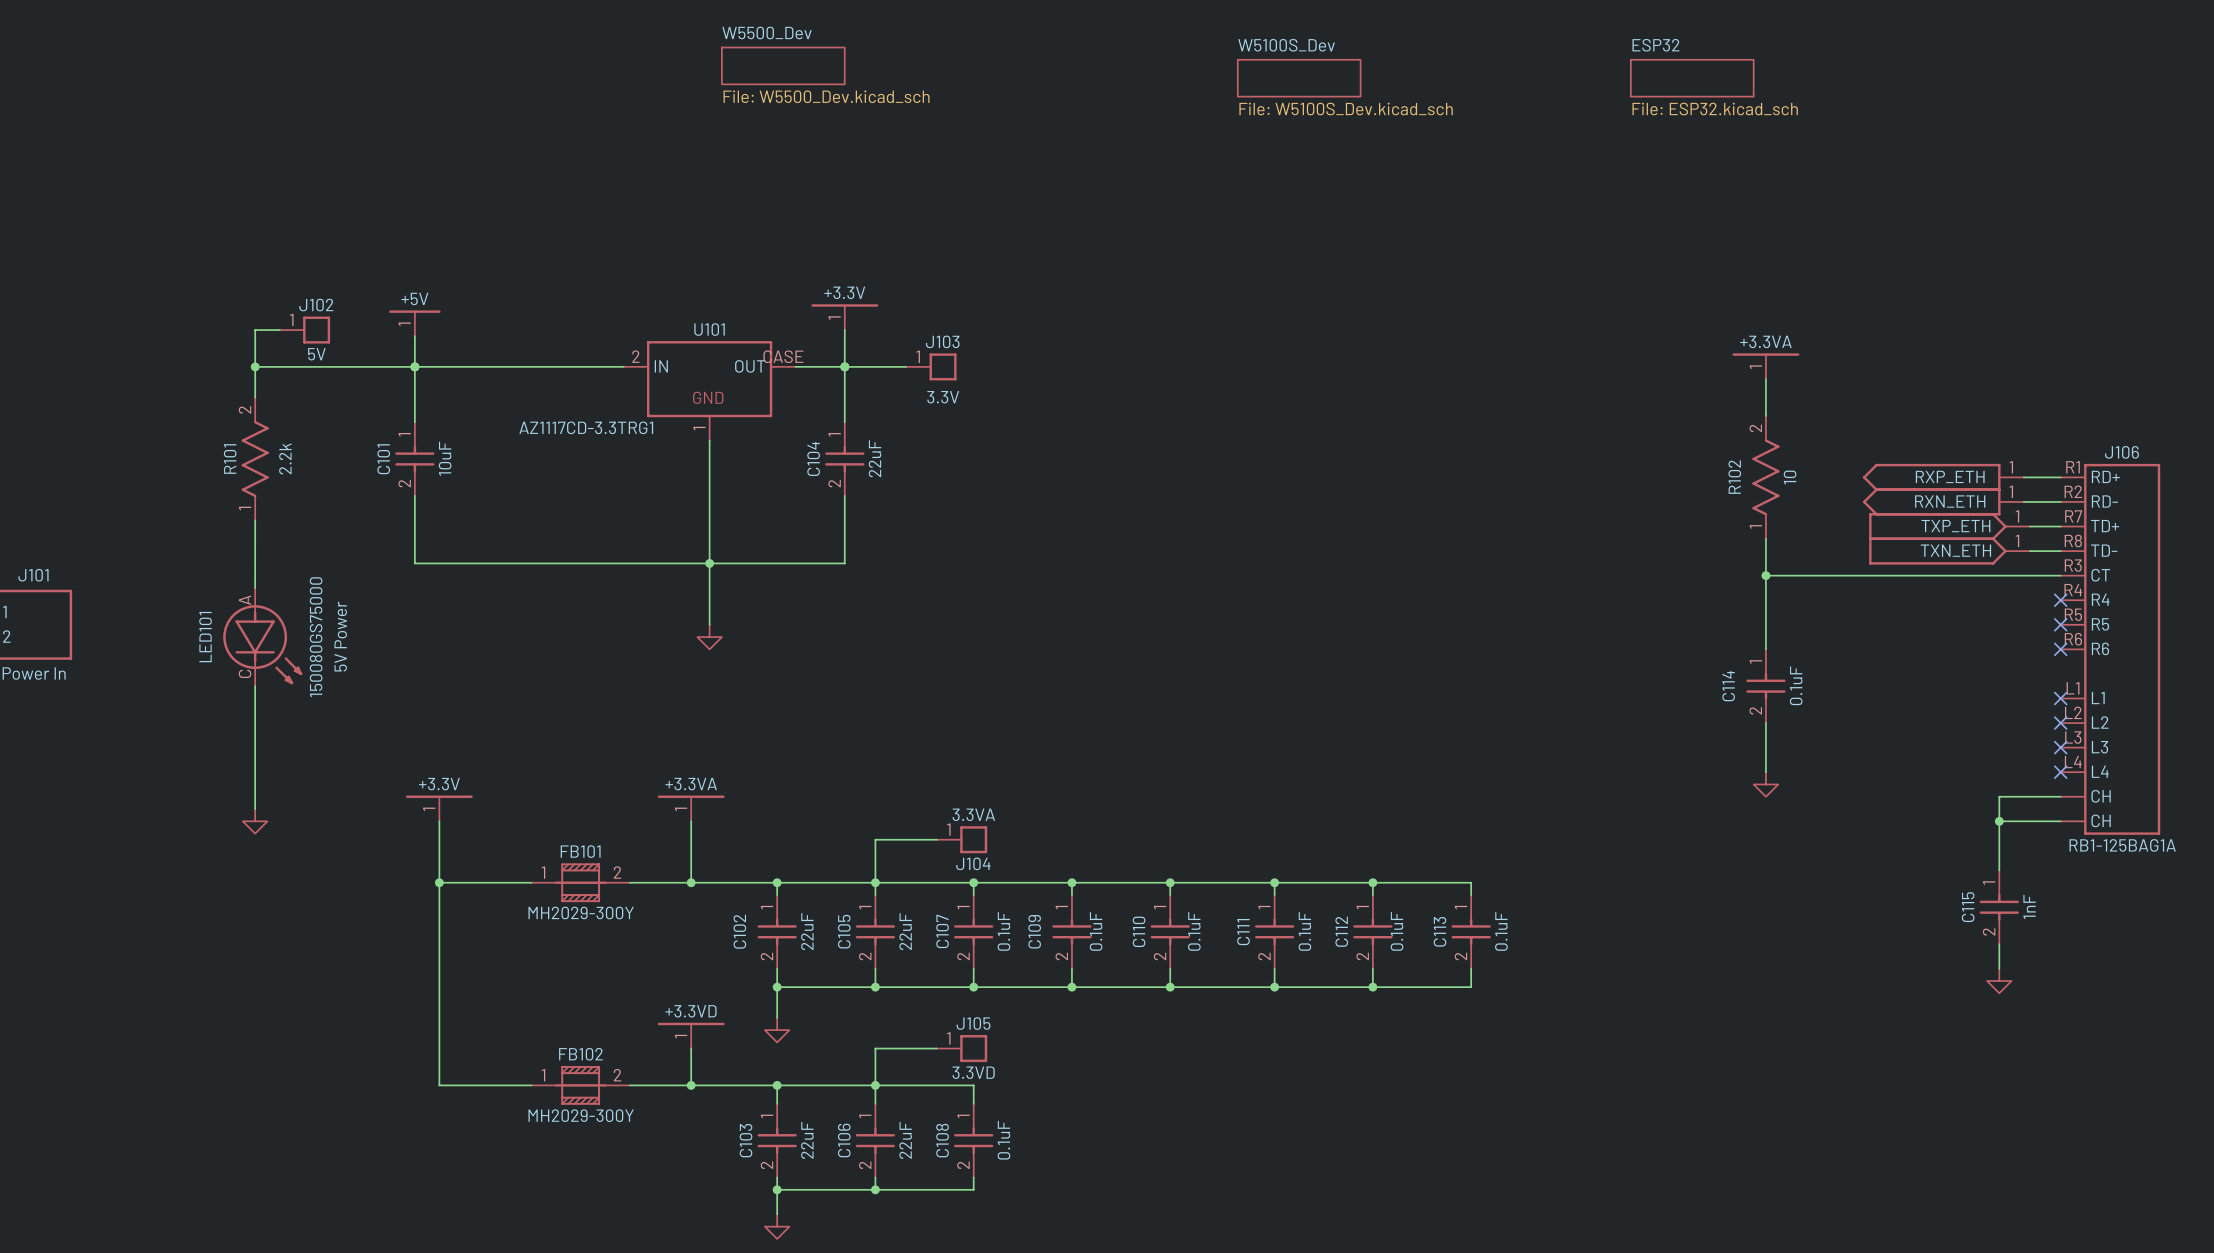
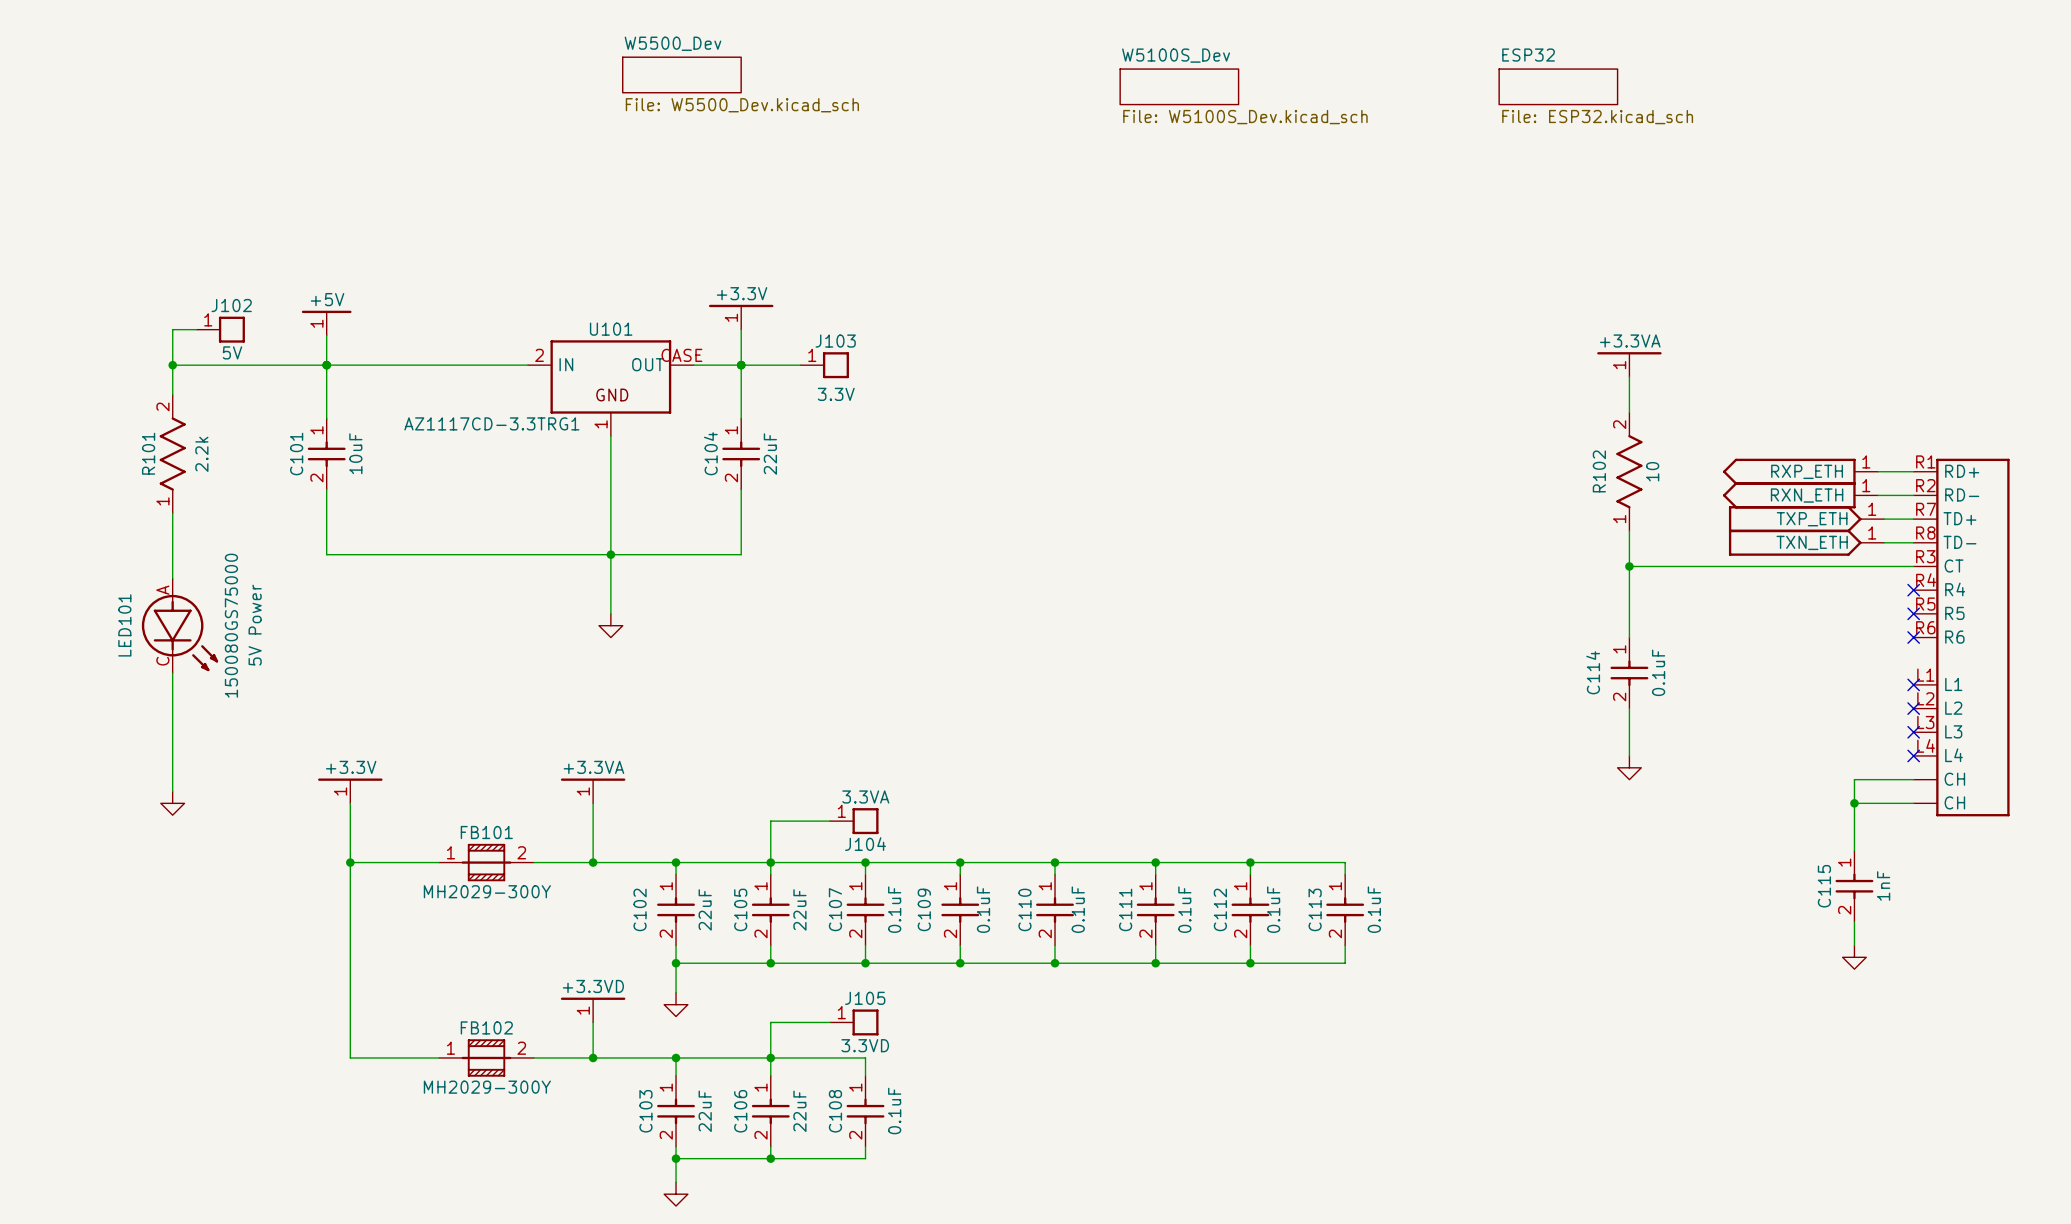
J106 name: J106 (2121, 452) -> none
J106 text: RB1-125BAG1A (2122, 845) -> none

